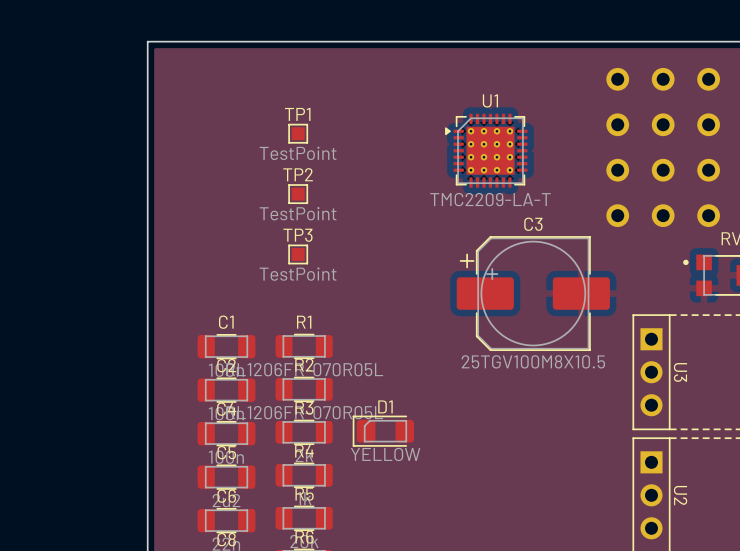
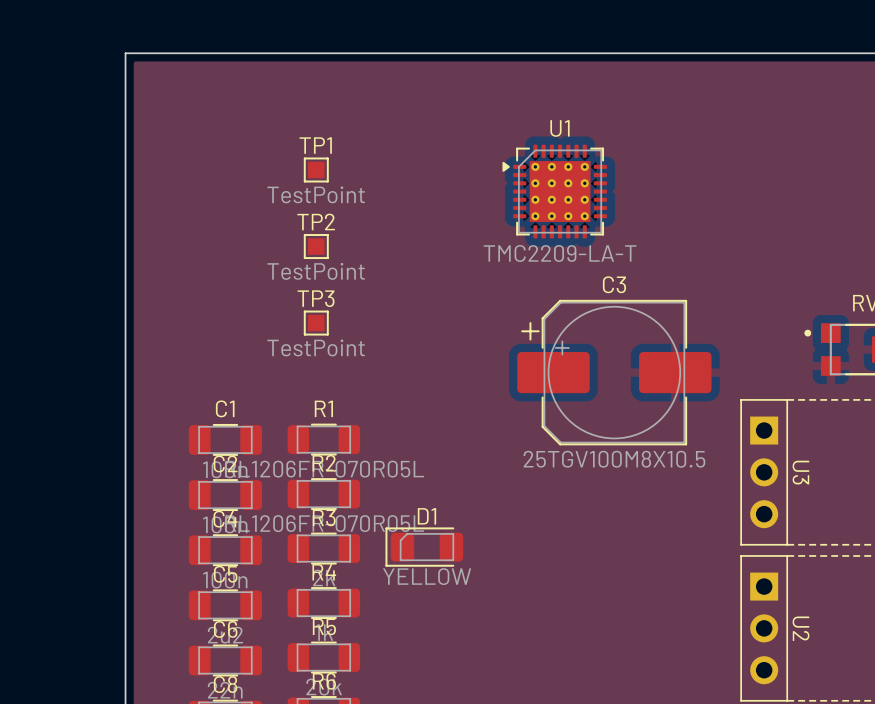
part: (617, 79) -> none
part: (663, 79) -> none
part: (708, 79) -> none
part: (617, 124) -> none
part: (663, 124) -> none
part: (708, 124) -> none
part: (617, 170) -> none
part: (663, 170) -> none
part: (708, 170) -> none
part: (617, 215) -> none
part: (663, 215) -> none
part: (708, 215) -> none

